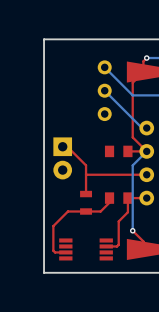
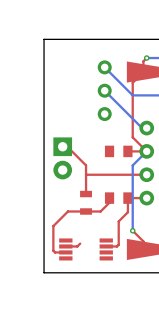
top track: none -> (80, 243) (77, 246) (65, 246)

